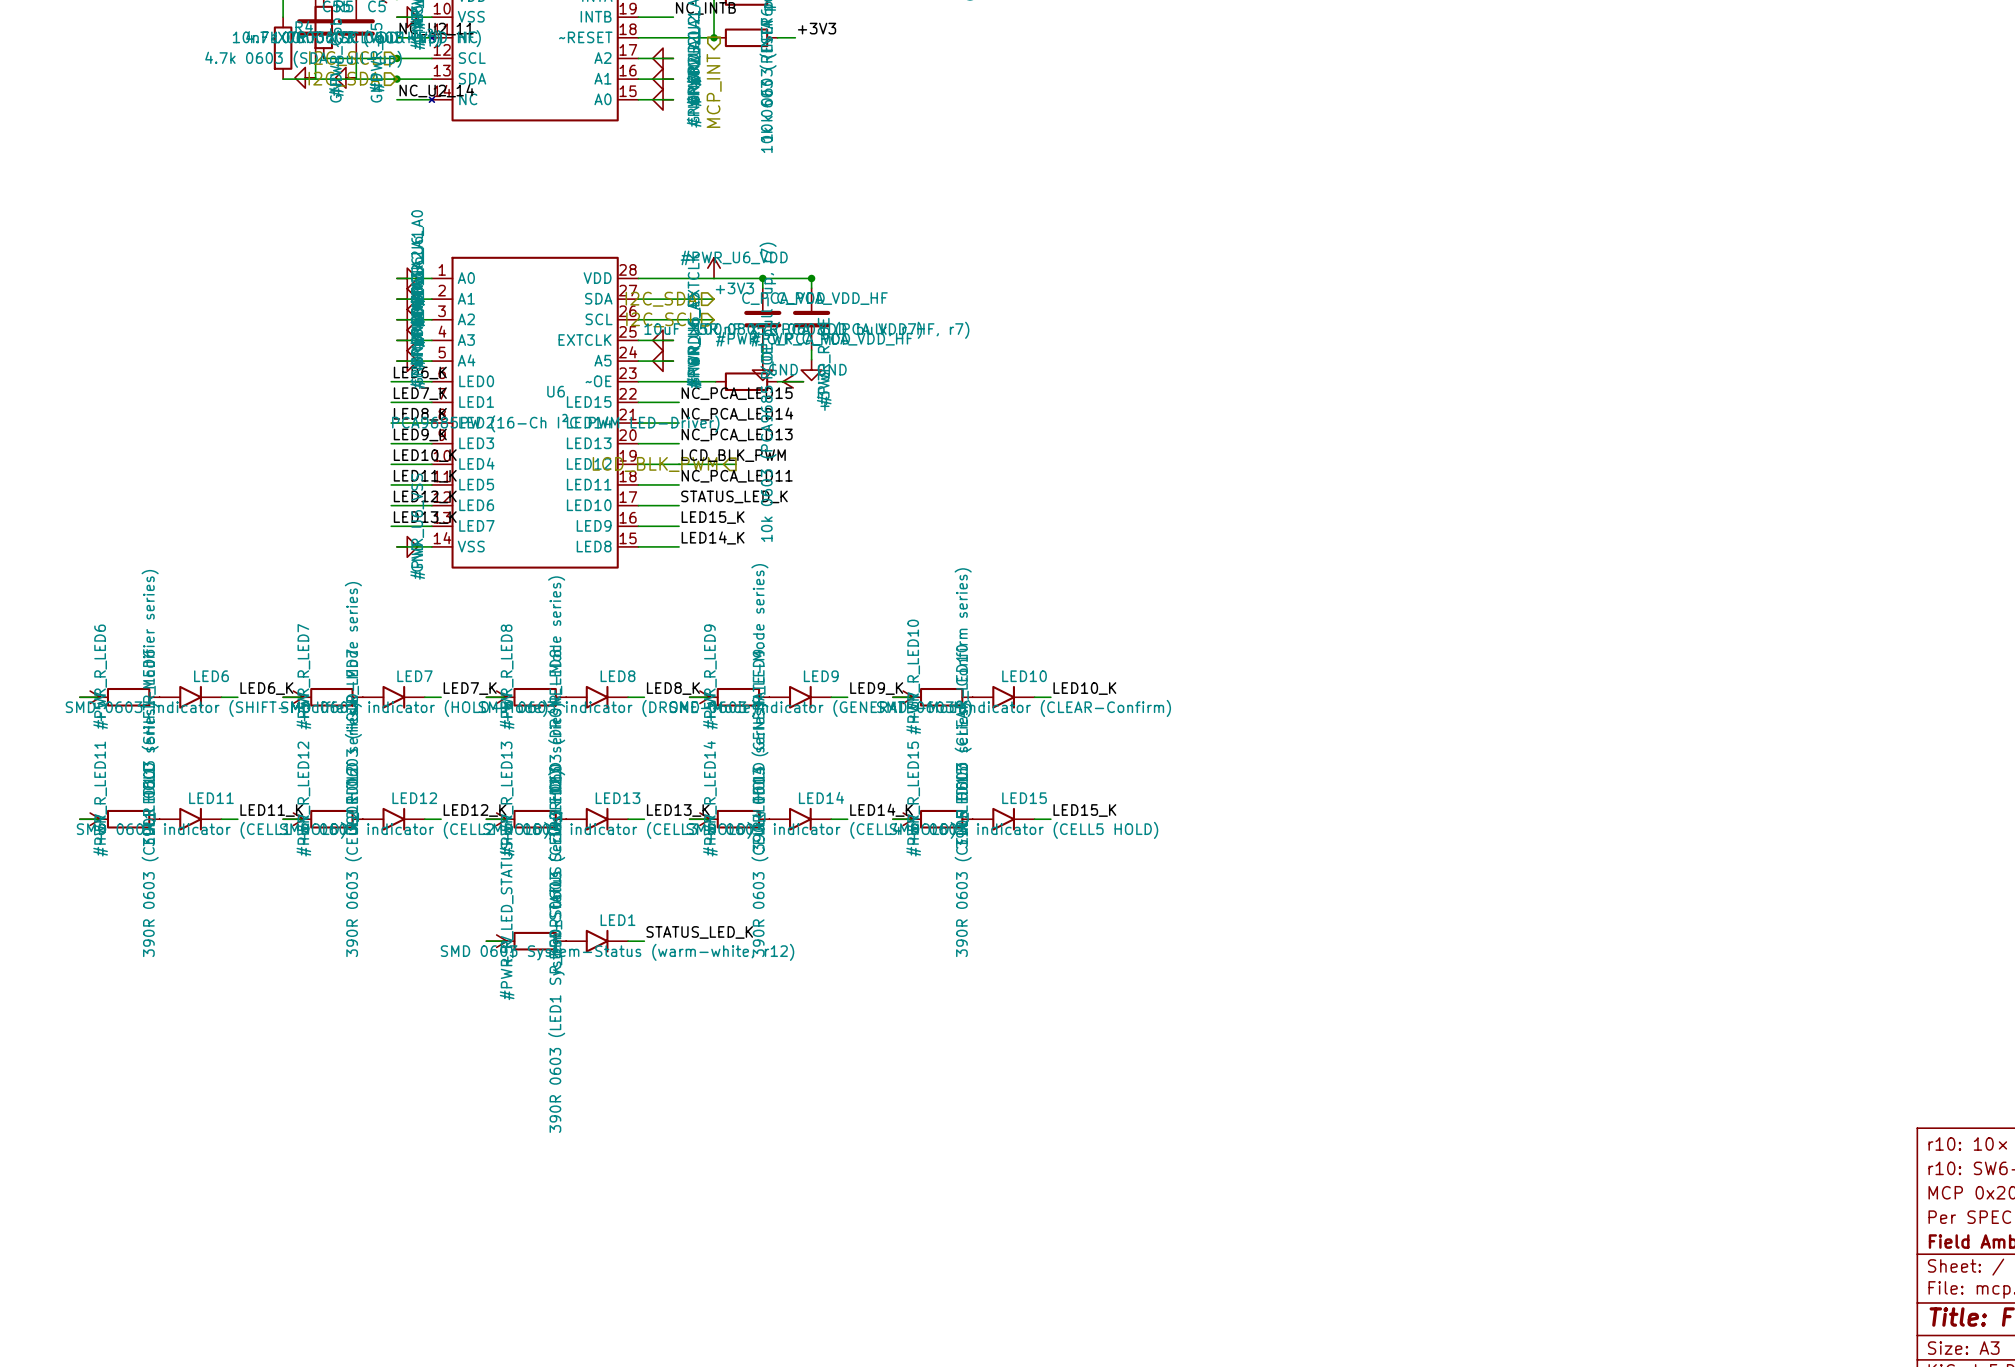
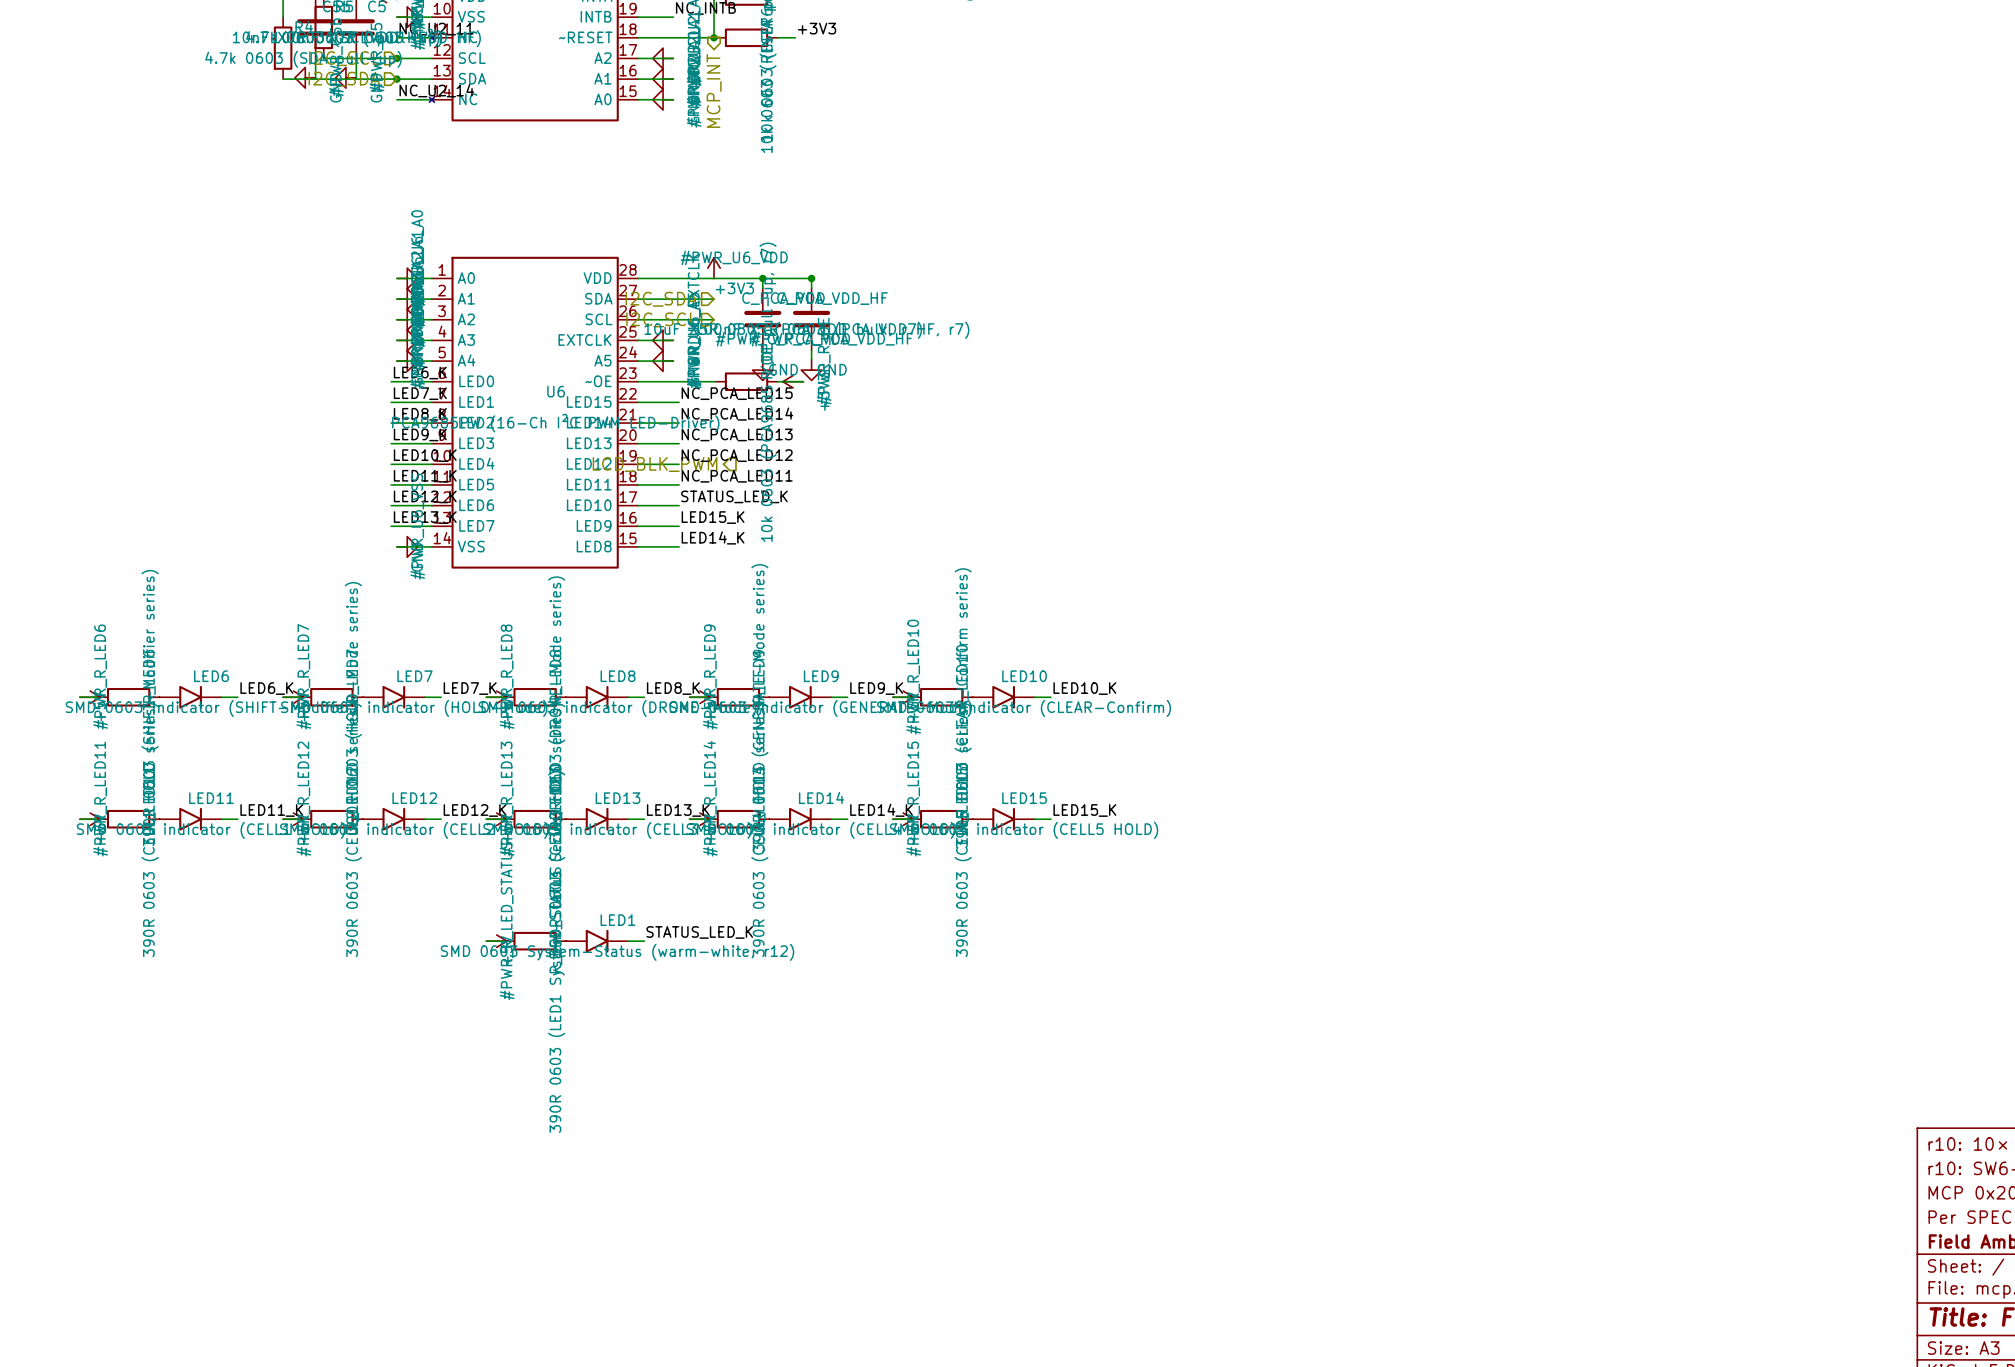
label: LCD_BLK_PWM (733, 455) -> NC_PCA_LED12 (737, 455)
wire: (679, 464) (735, 464) -> none

